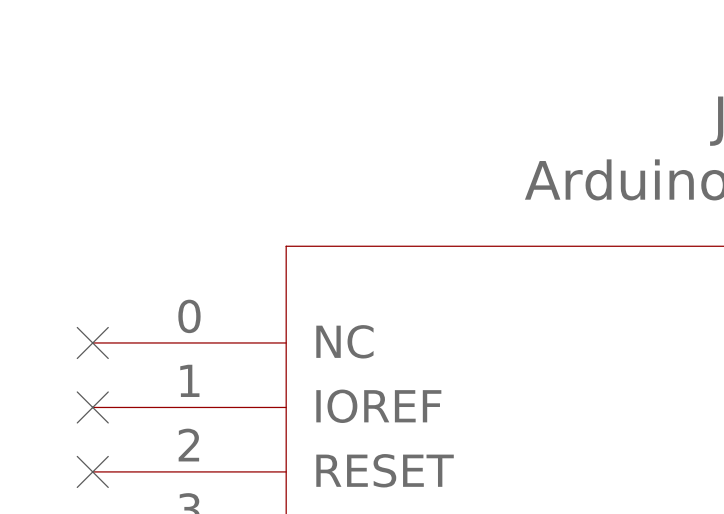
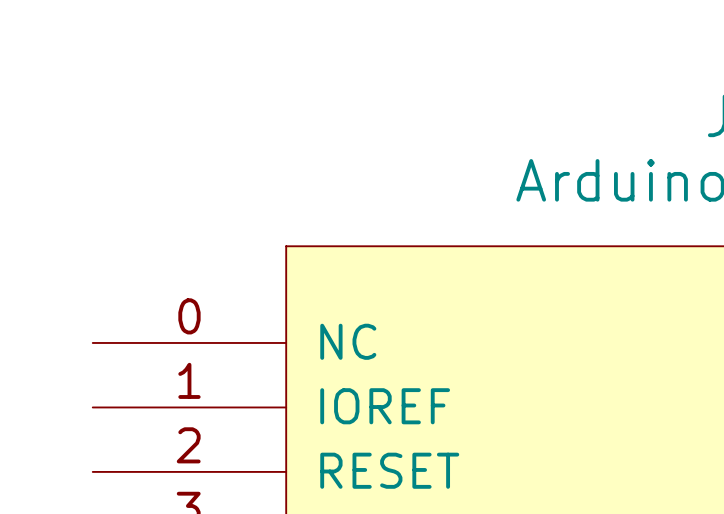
no-connect mark: (92, 342) -> none
no-connect mark: (92, 407) -> none
no-connect mark: (92, 471) -> none

